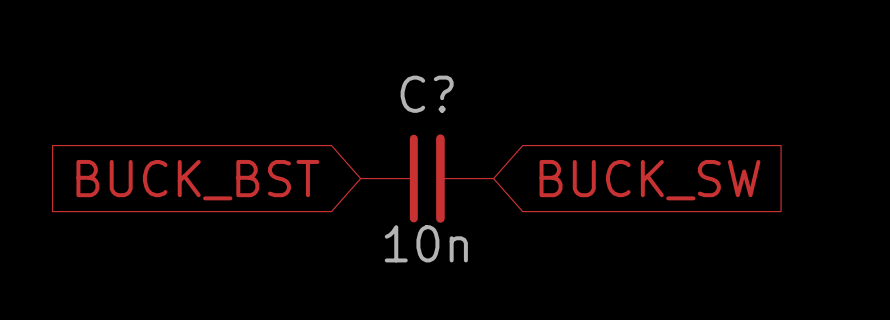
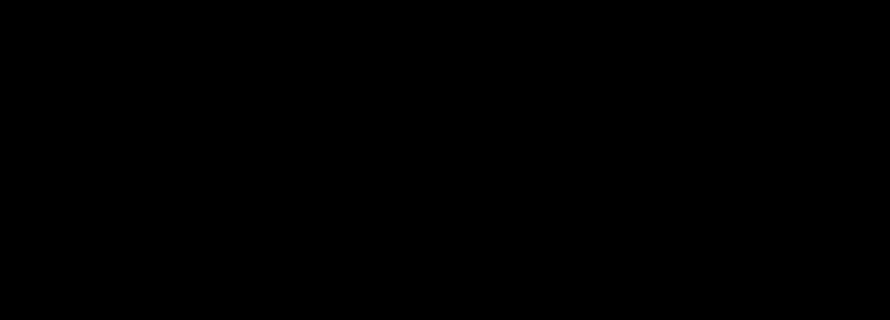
C?: 10n (427, 178) -> none
global label: BUCK_BST (197, 180) -> none
global label: BUCK_SW (649, 180) -> none

